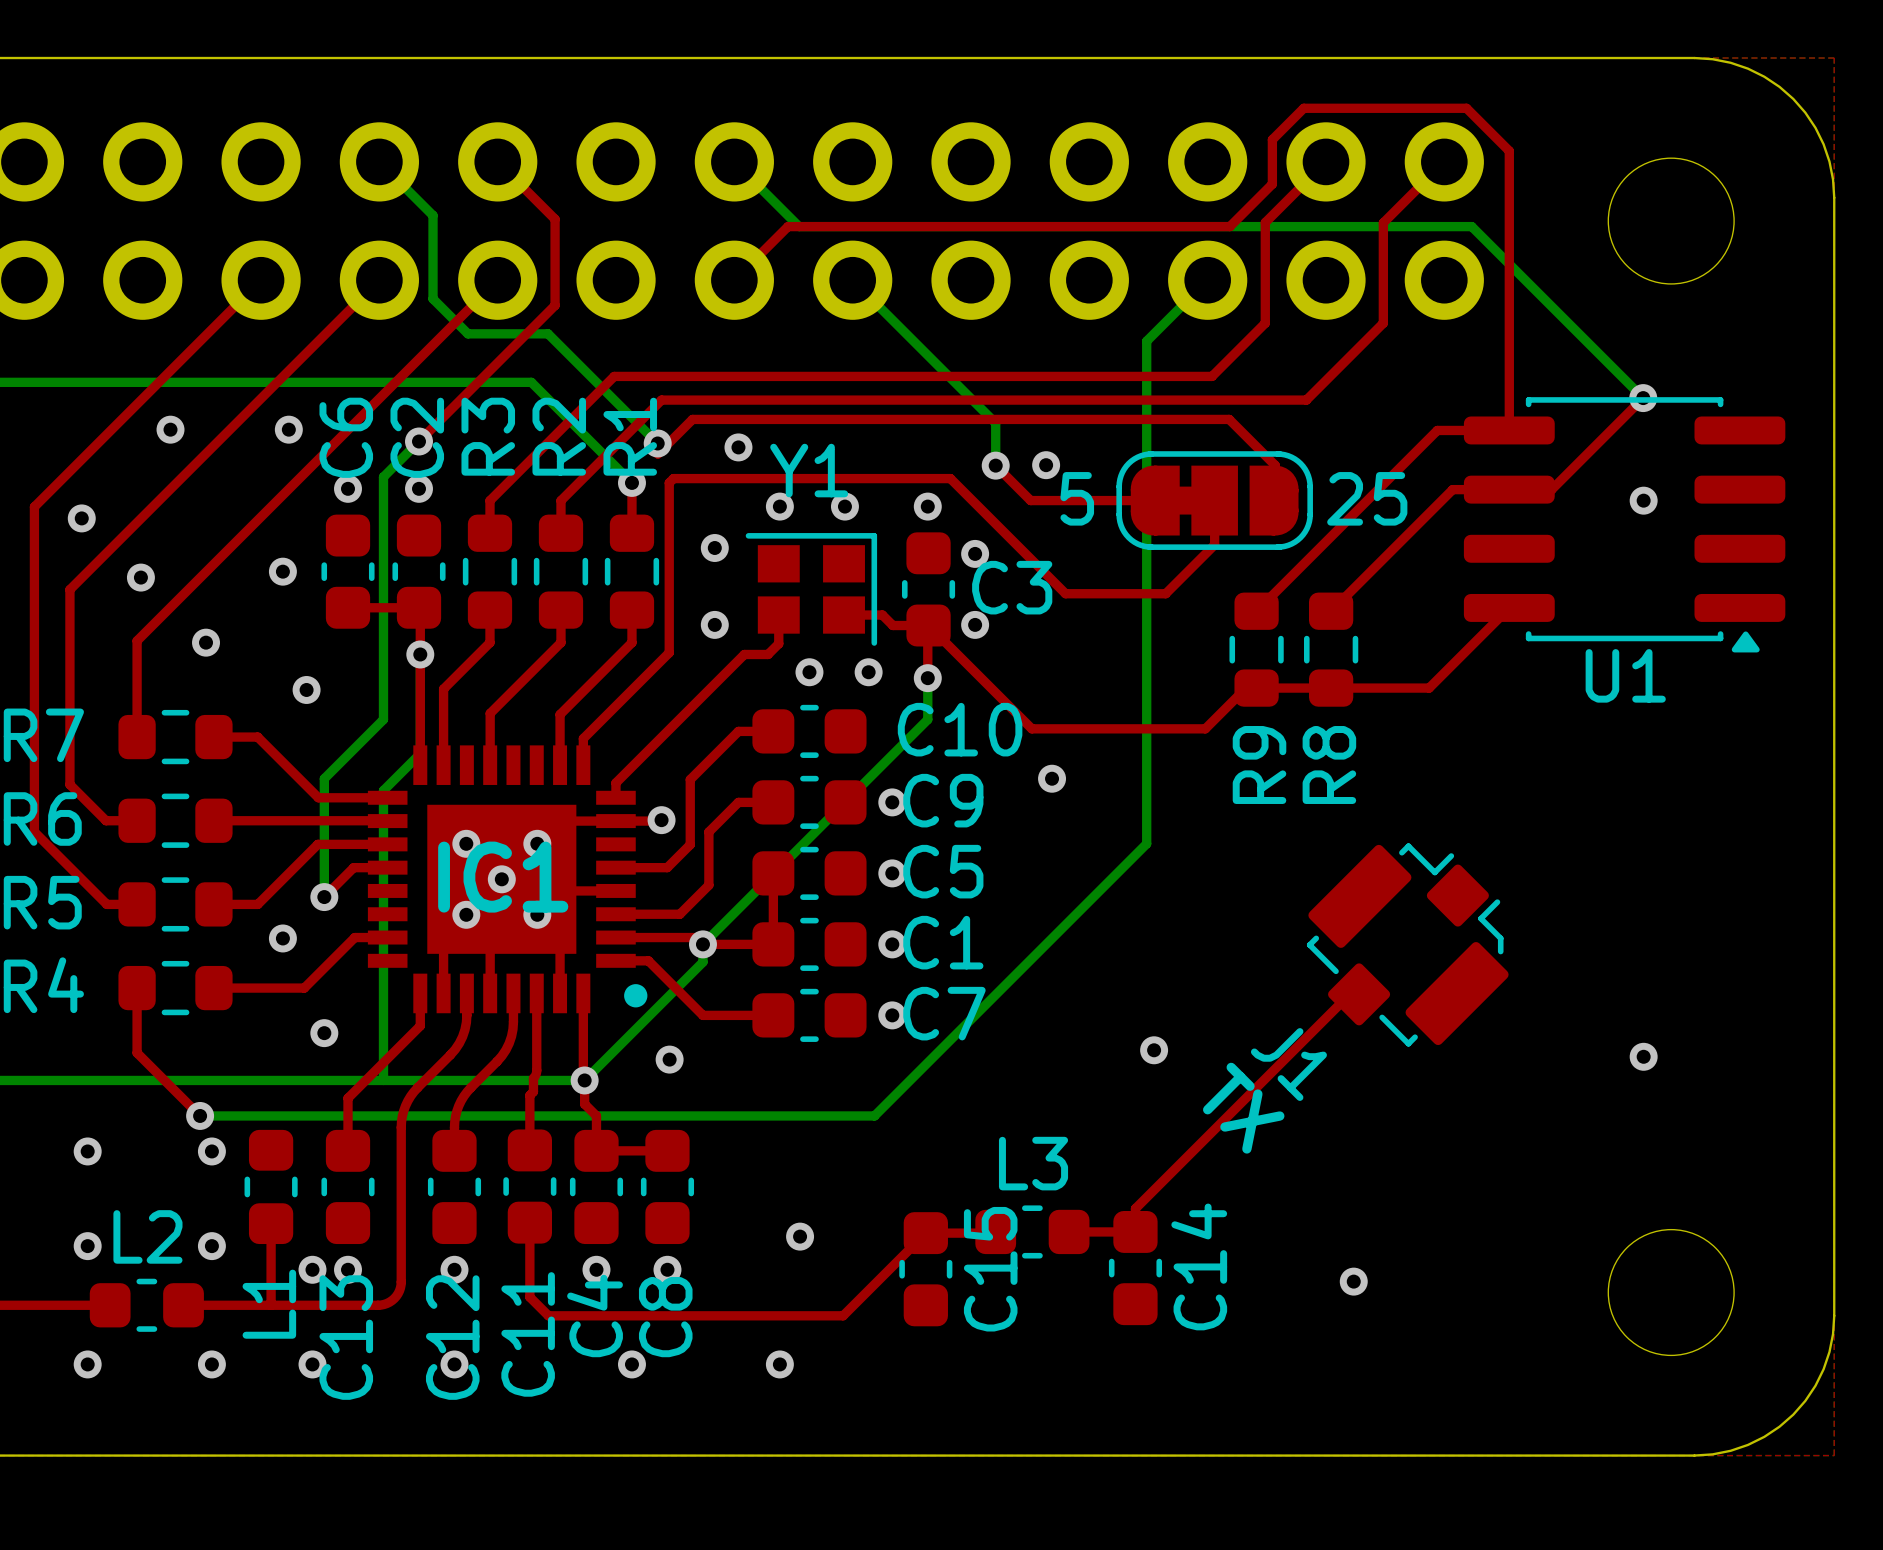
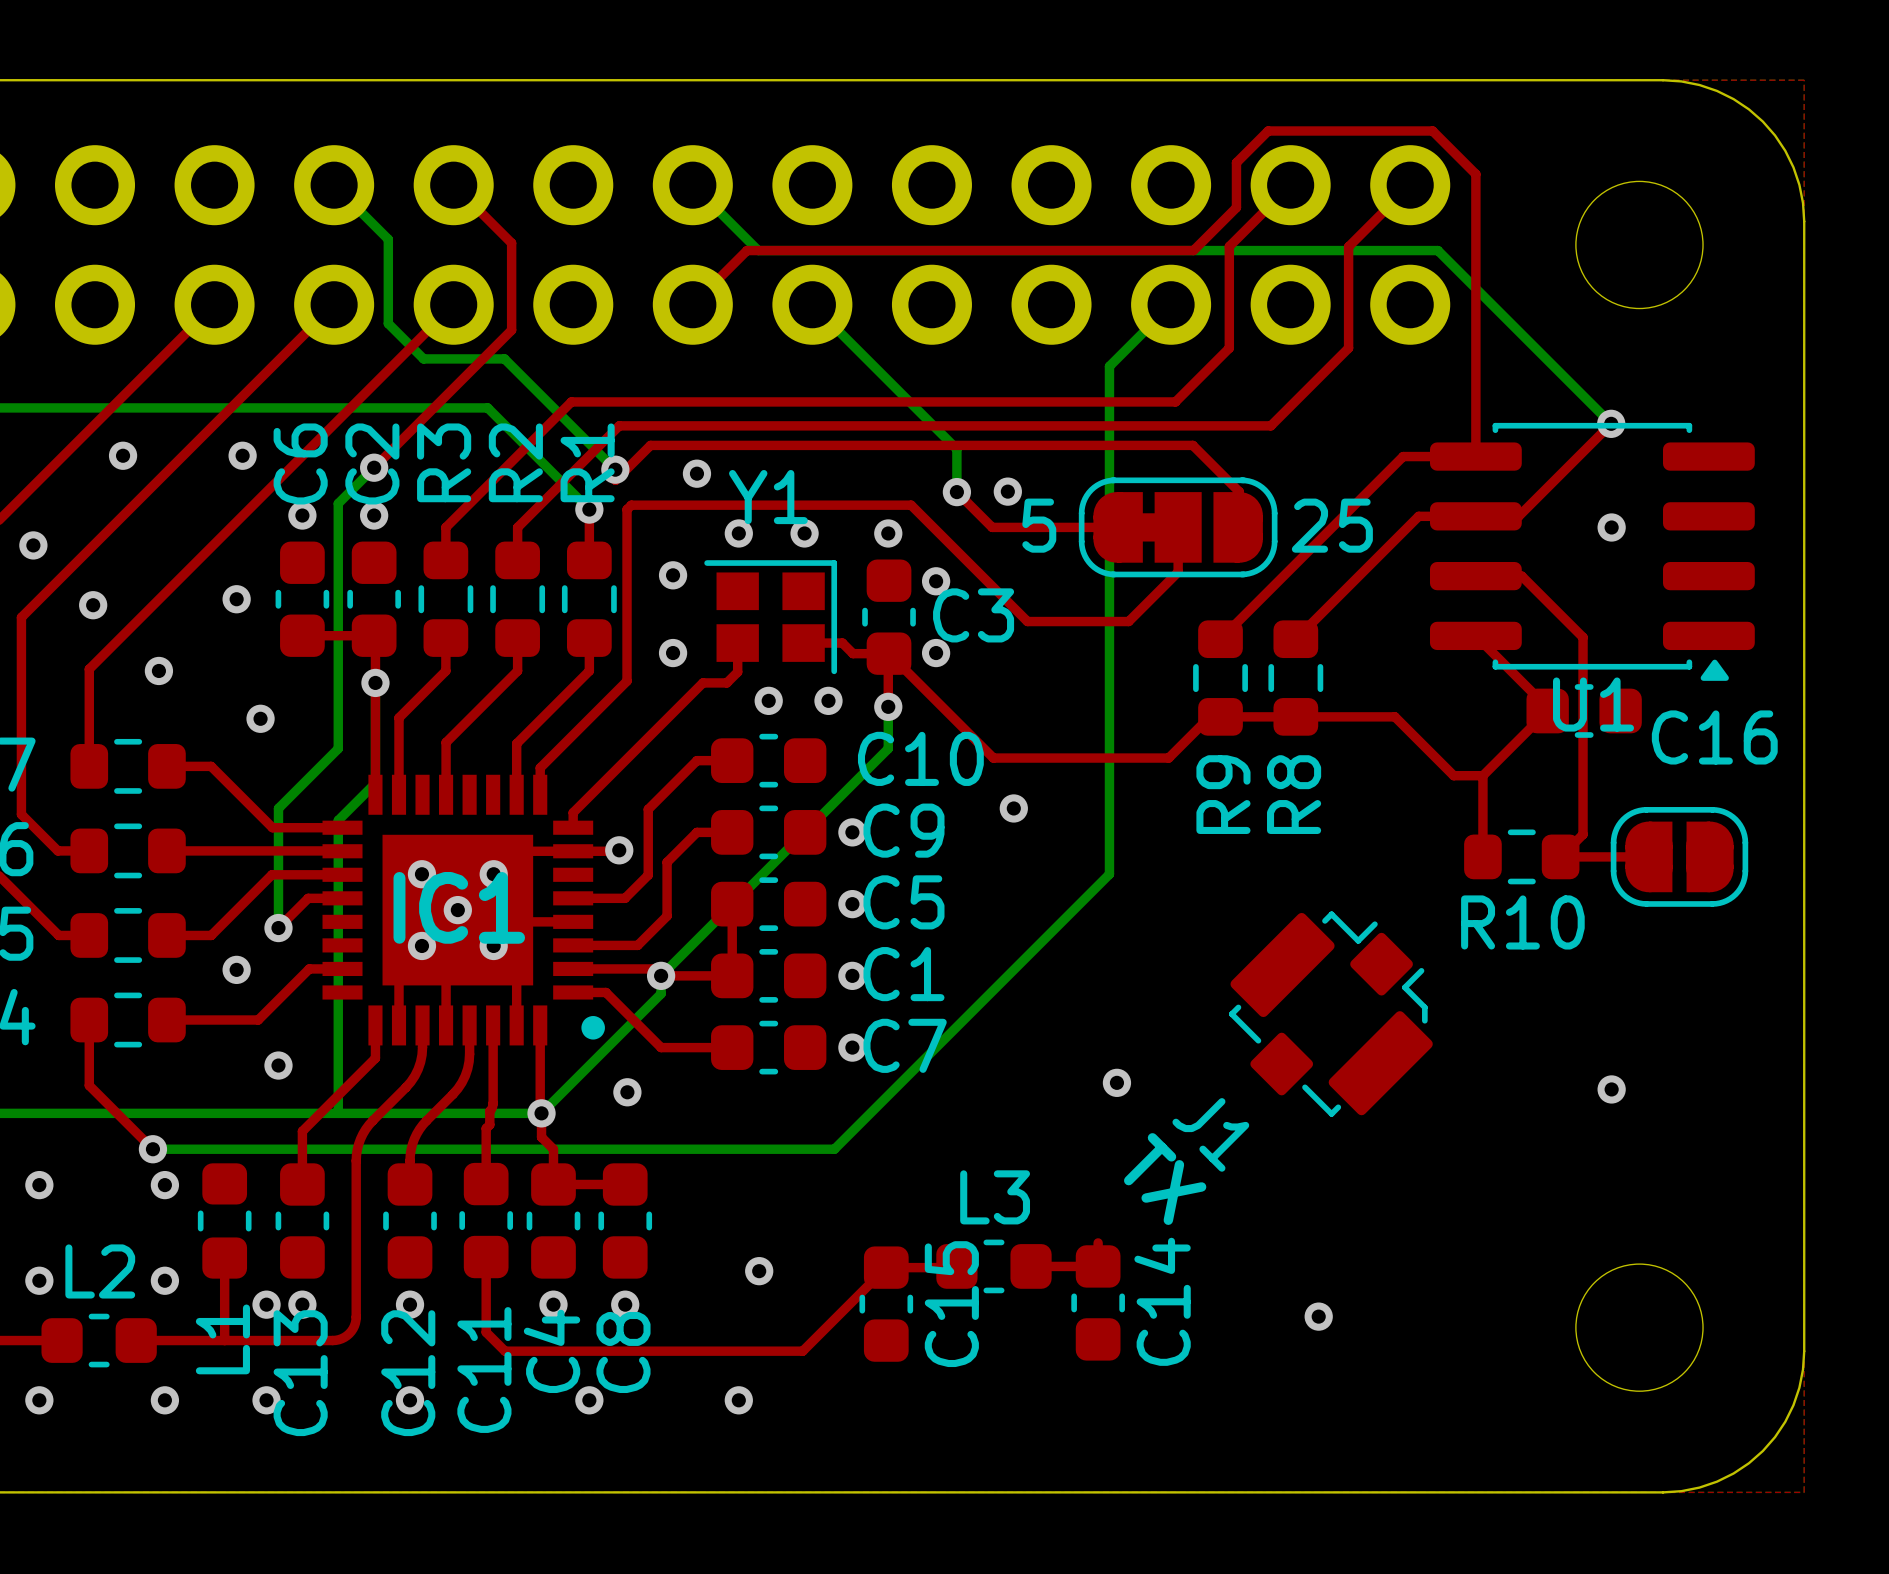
top track: none -> (1475, 576) (1521, 576) (1583, 637) (1583, 834) (1560, 856) (1648, 856)
top track: (1509, 607) (1429, 688) -> (1475, 635) (1547, 707) (1547, 710) (1482, 775)
C16: none -> (1584, 710)
top track: none -> (1394, 716) (1453, 775) (1482, 775)
top track: none -> (1482, 775) (1482, 856)
R10: none -> (1521, 856)
part: none -> (1679, 856)
J1 position: (1407, 944) -> (1330, 1014)
top track: (1359, 994) (1349, 994) (1135, 1208) -> none
text position: TX (1243, 1108) -> TX (1165, 1179)

